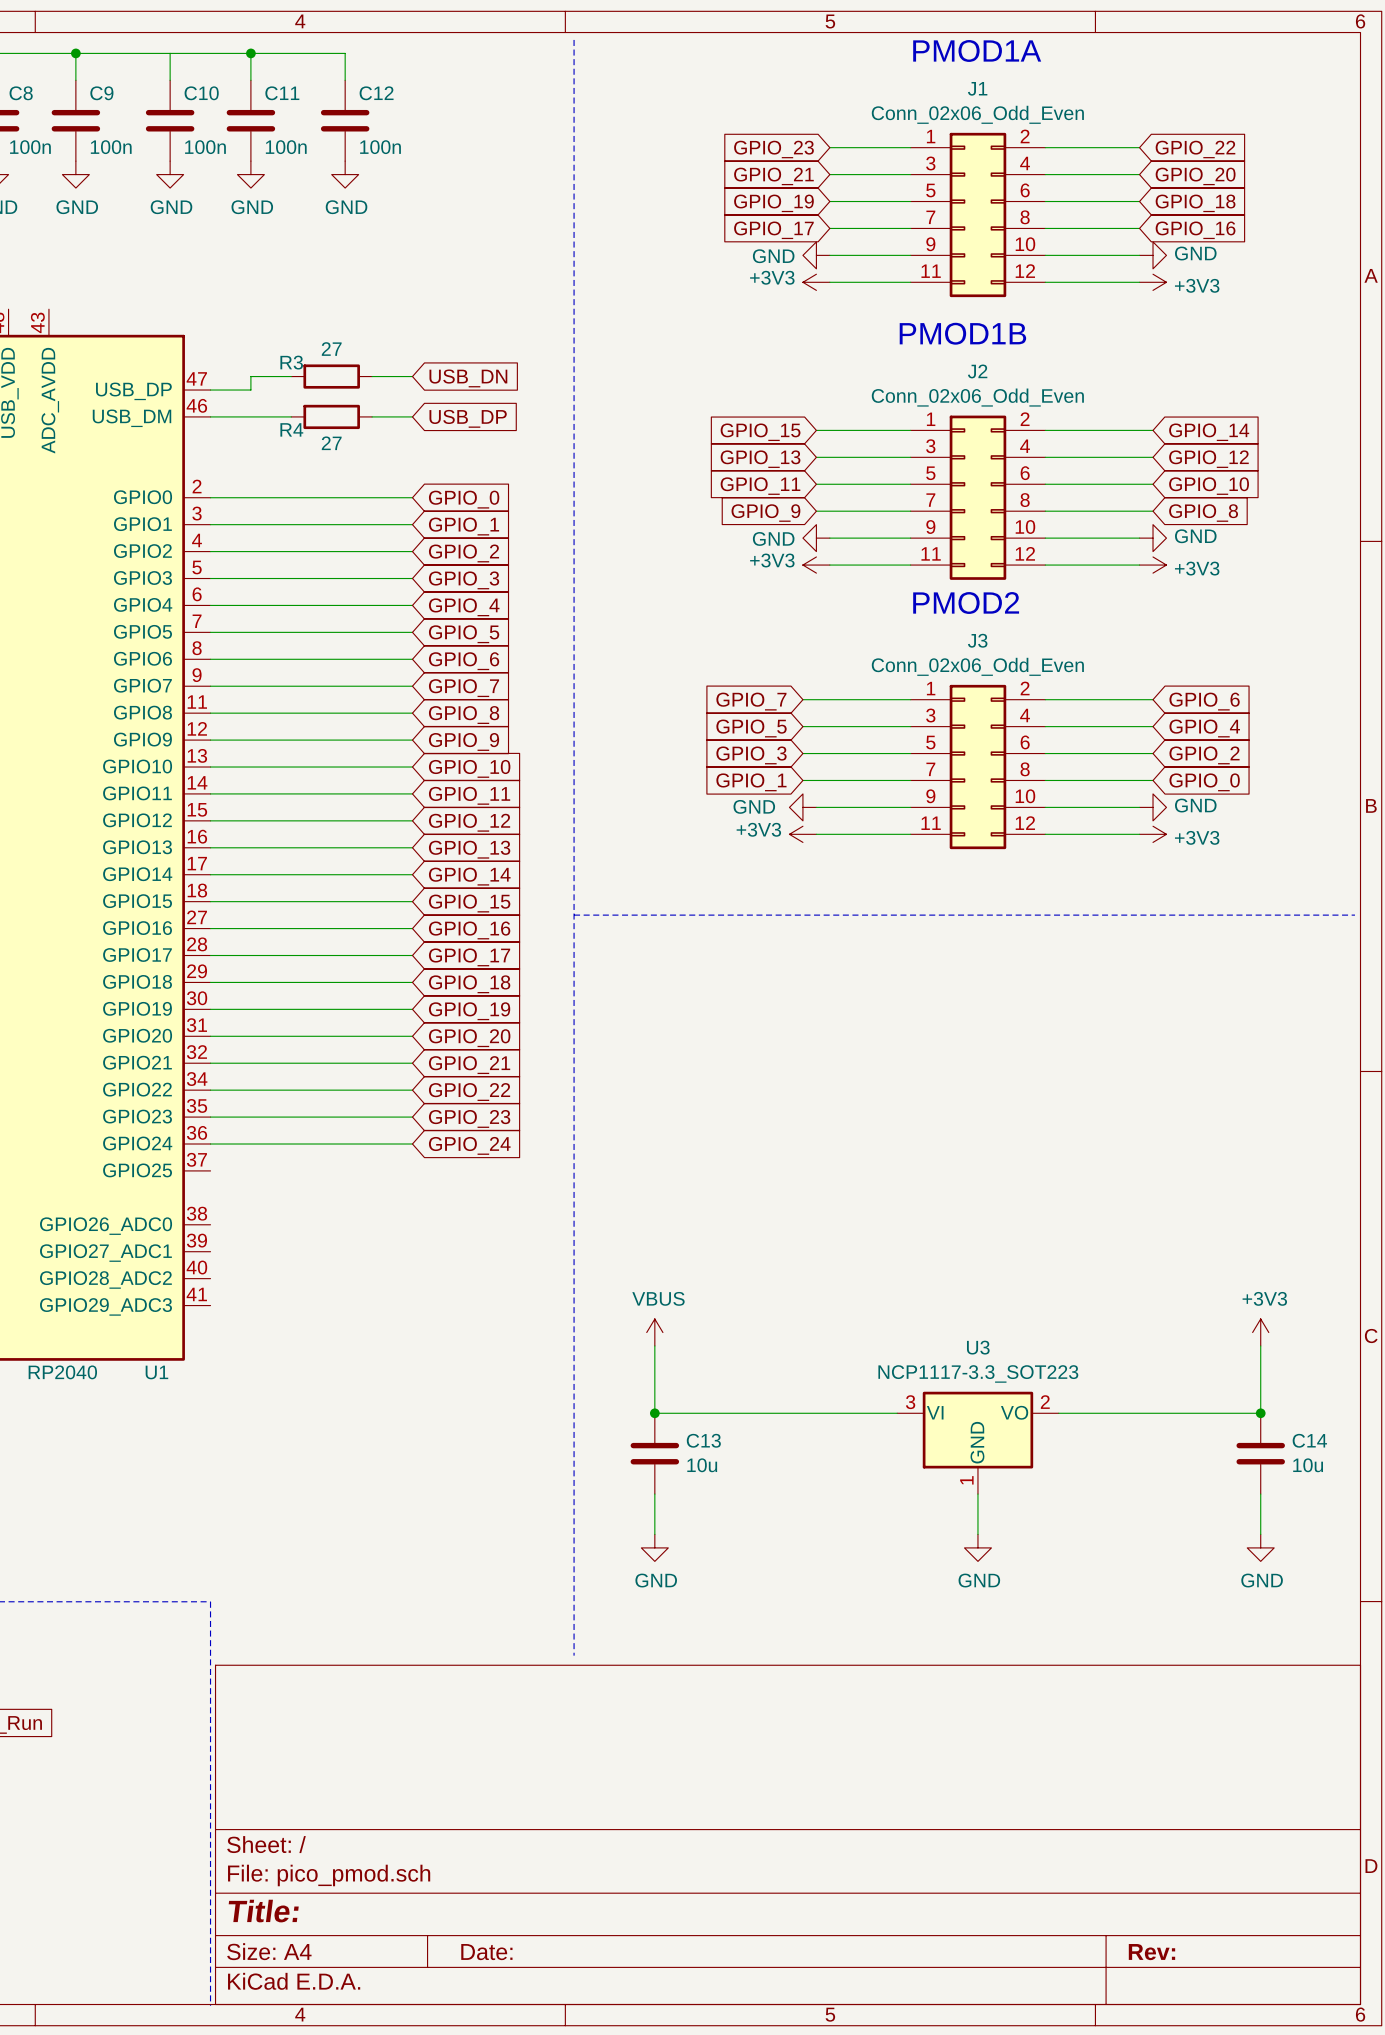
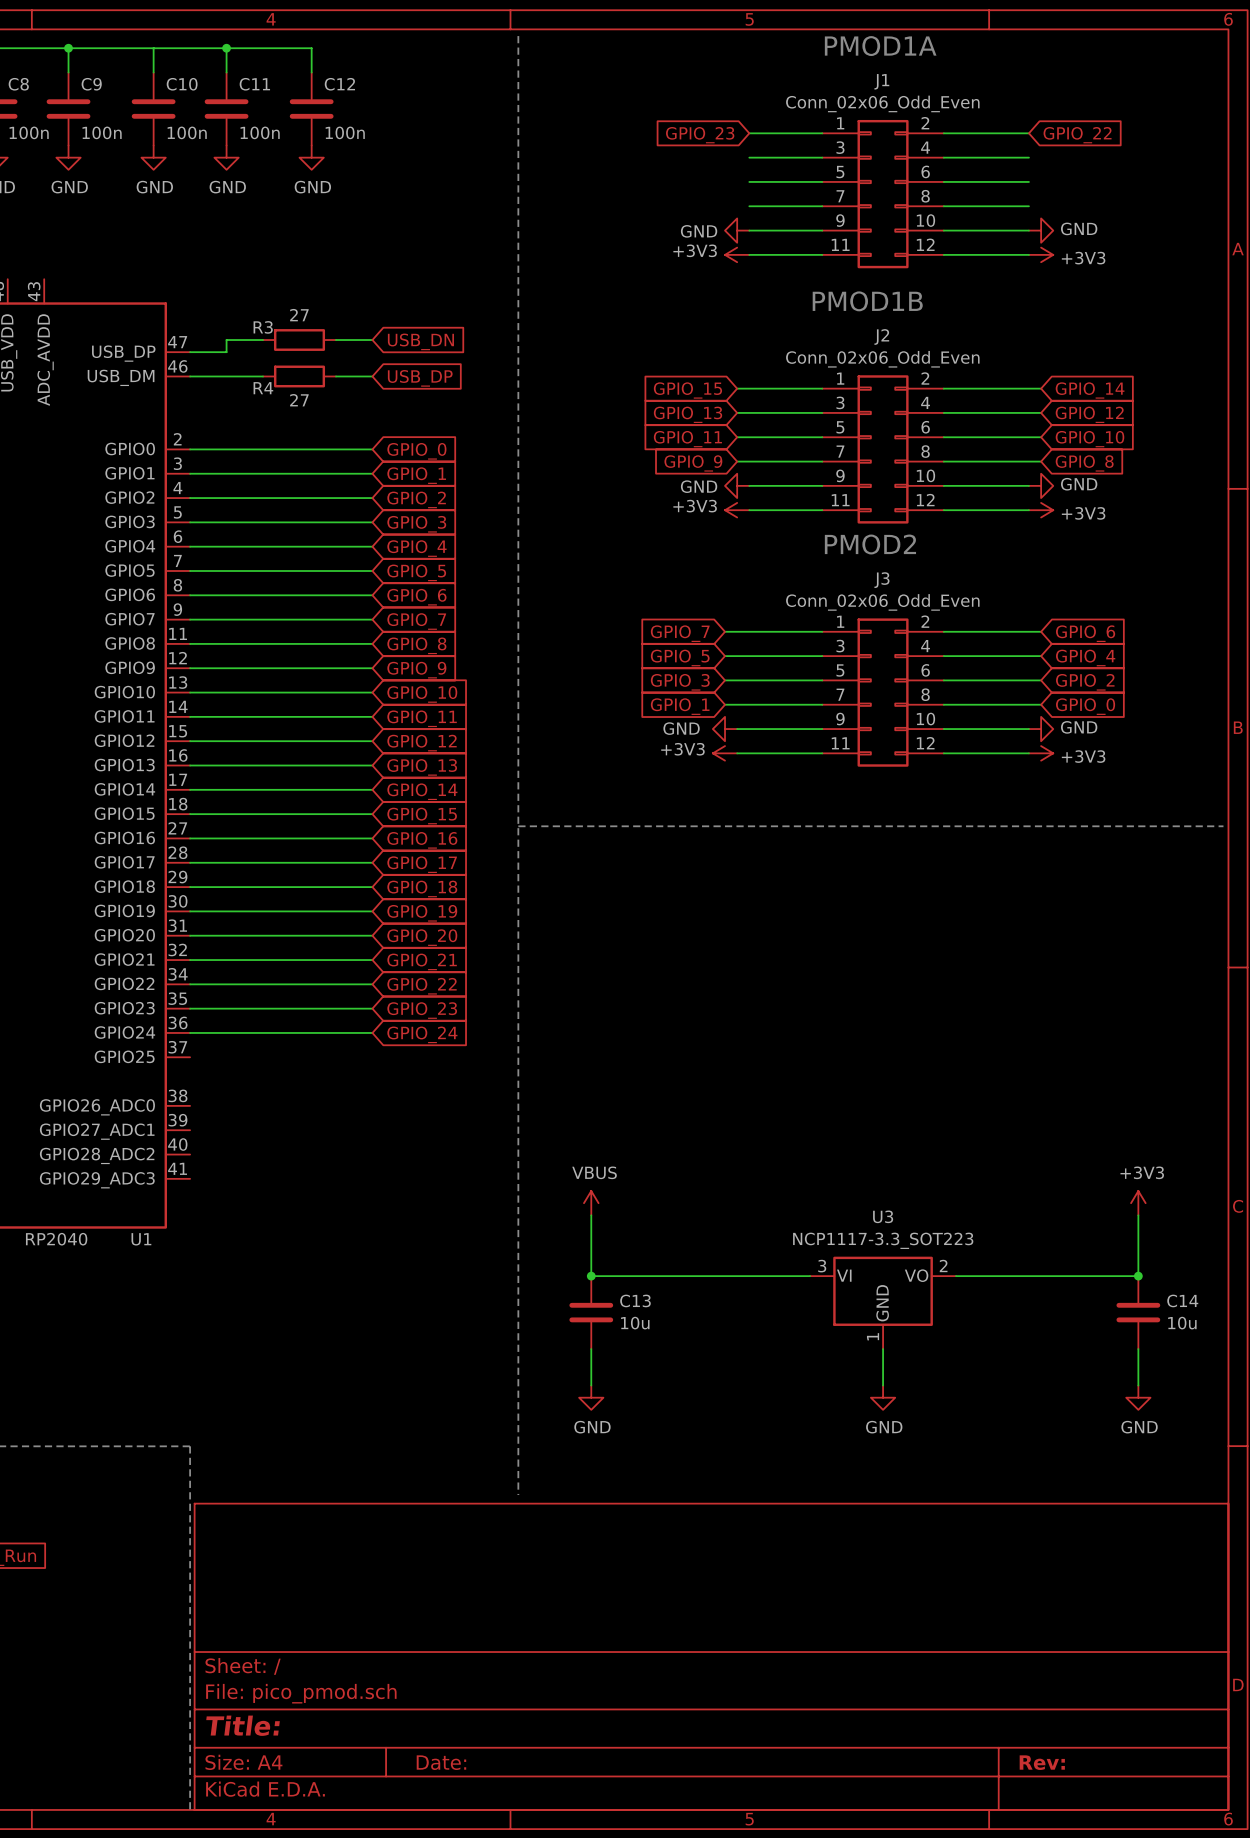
global label: GPIO_21 (773, 176) -> none
global label: GPIO_20 (1195, 176) -> none
global label: GPIO_19 (773, 203) -> none
global label: GPIO_18 (1195, 203) -> none
global label: GPIO_17 (773, 230) -> none
global label: GPIO_16 (1195, 230) -> none

